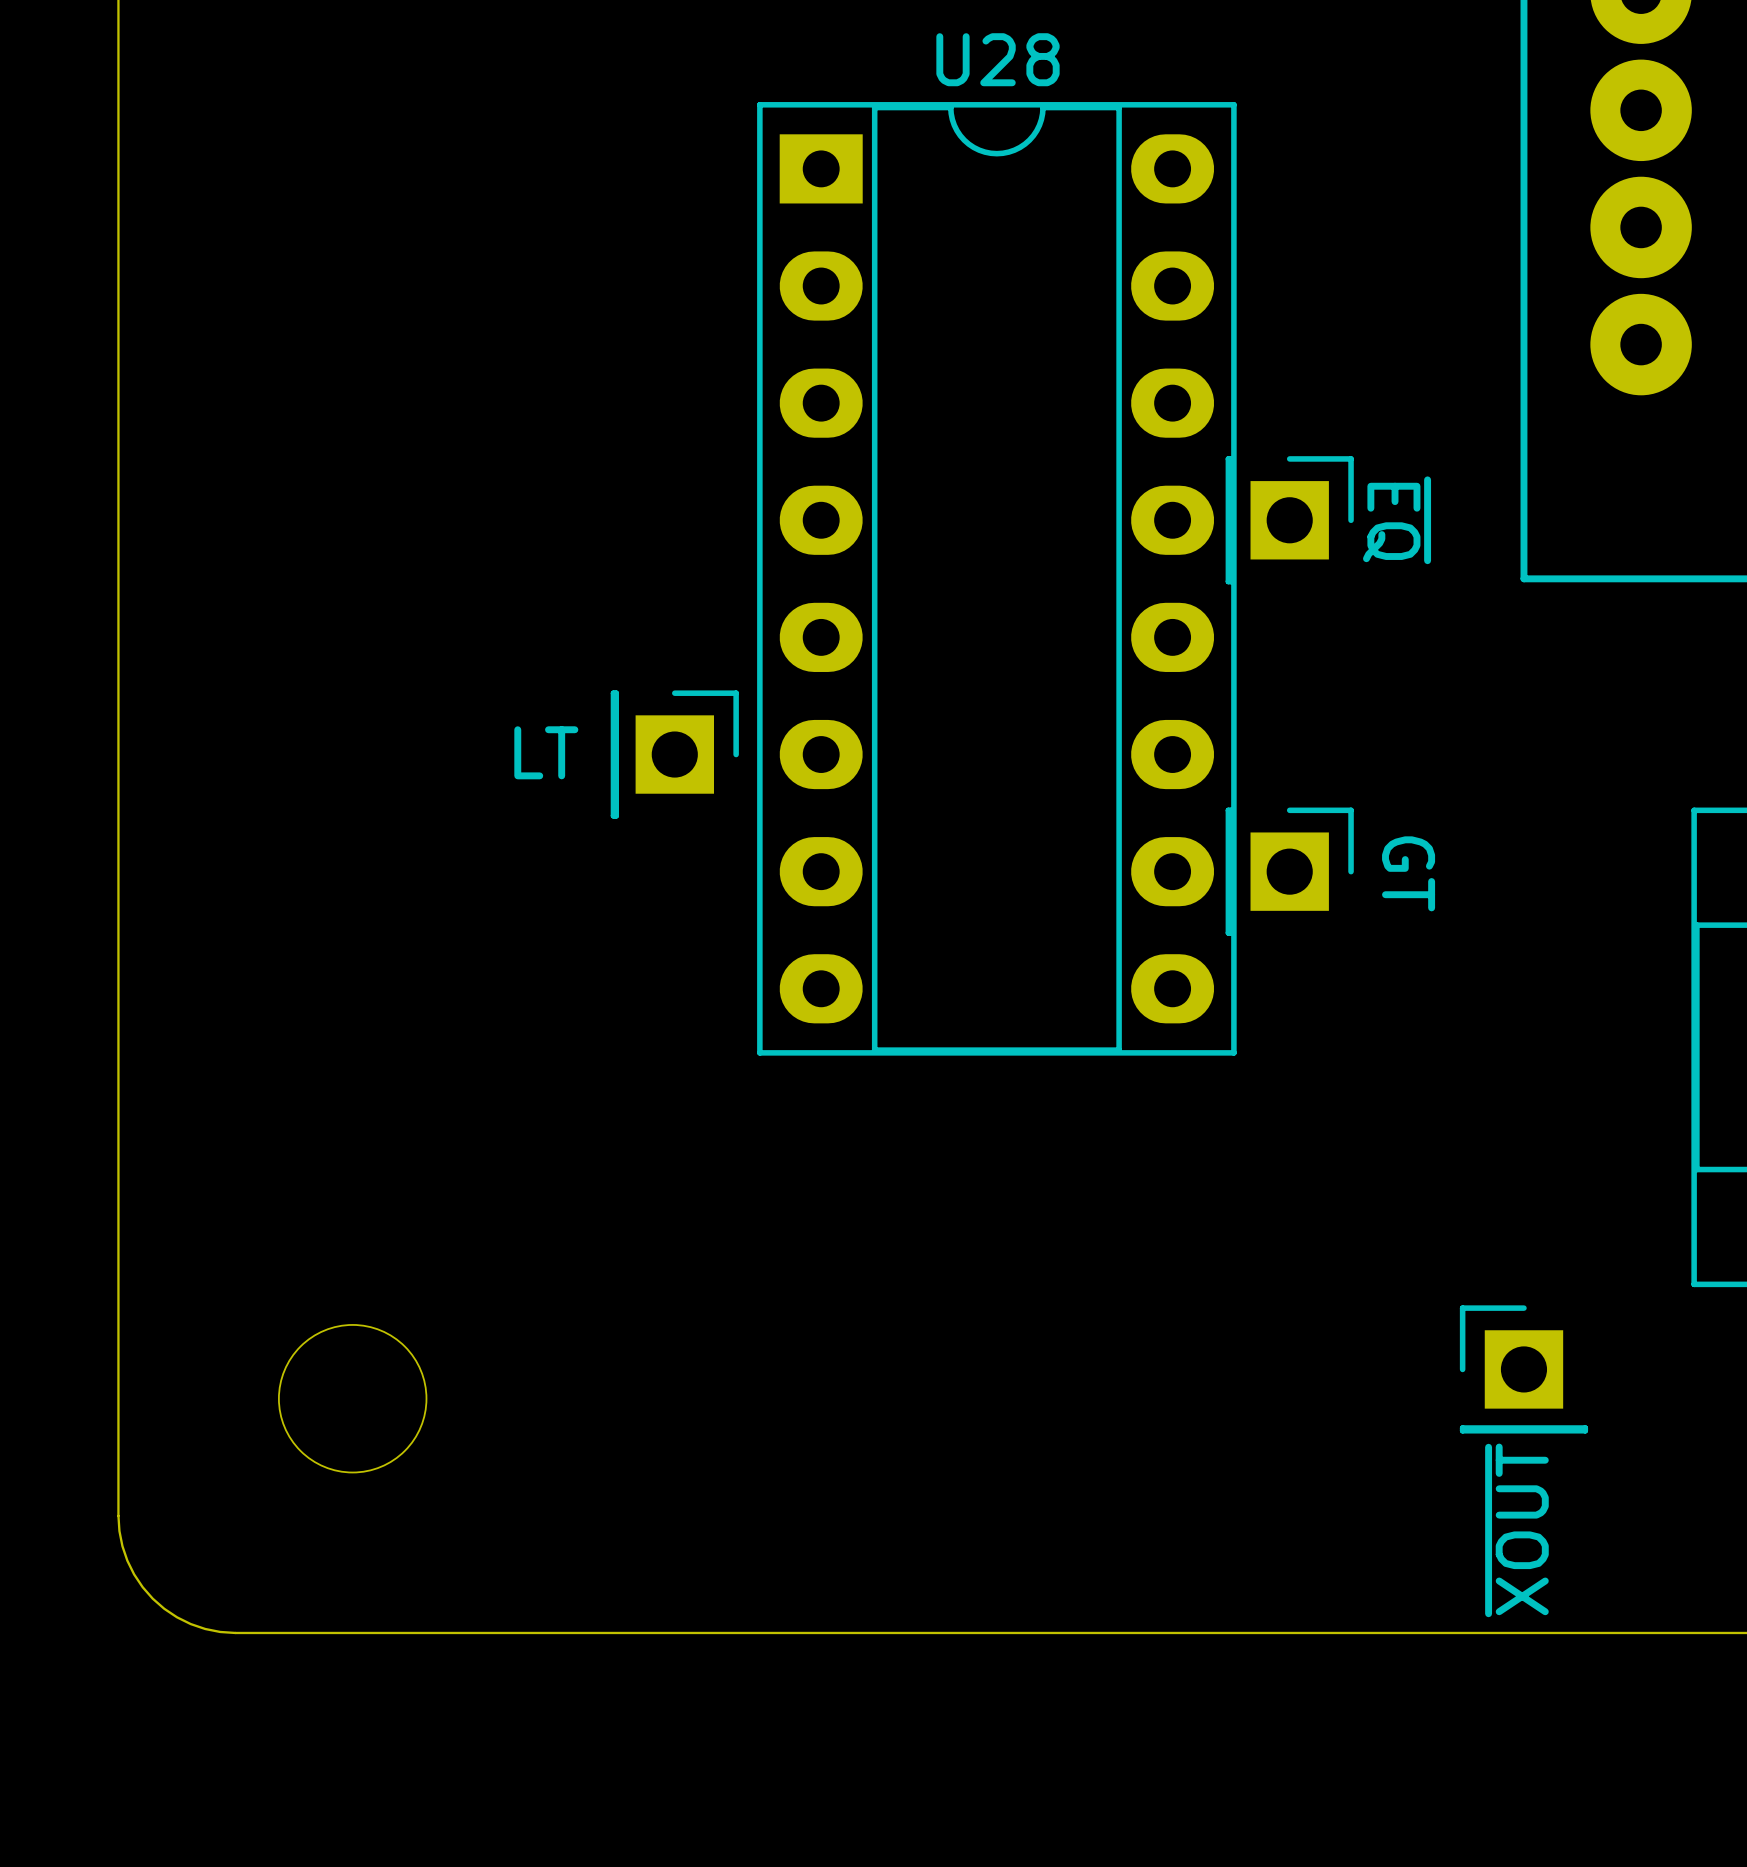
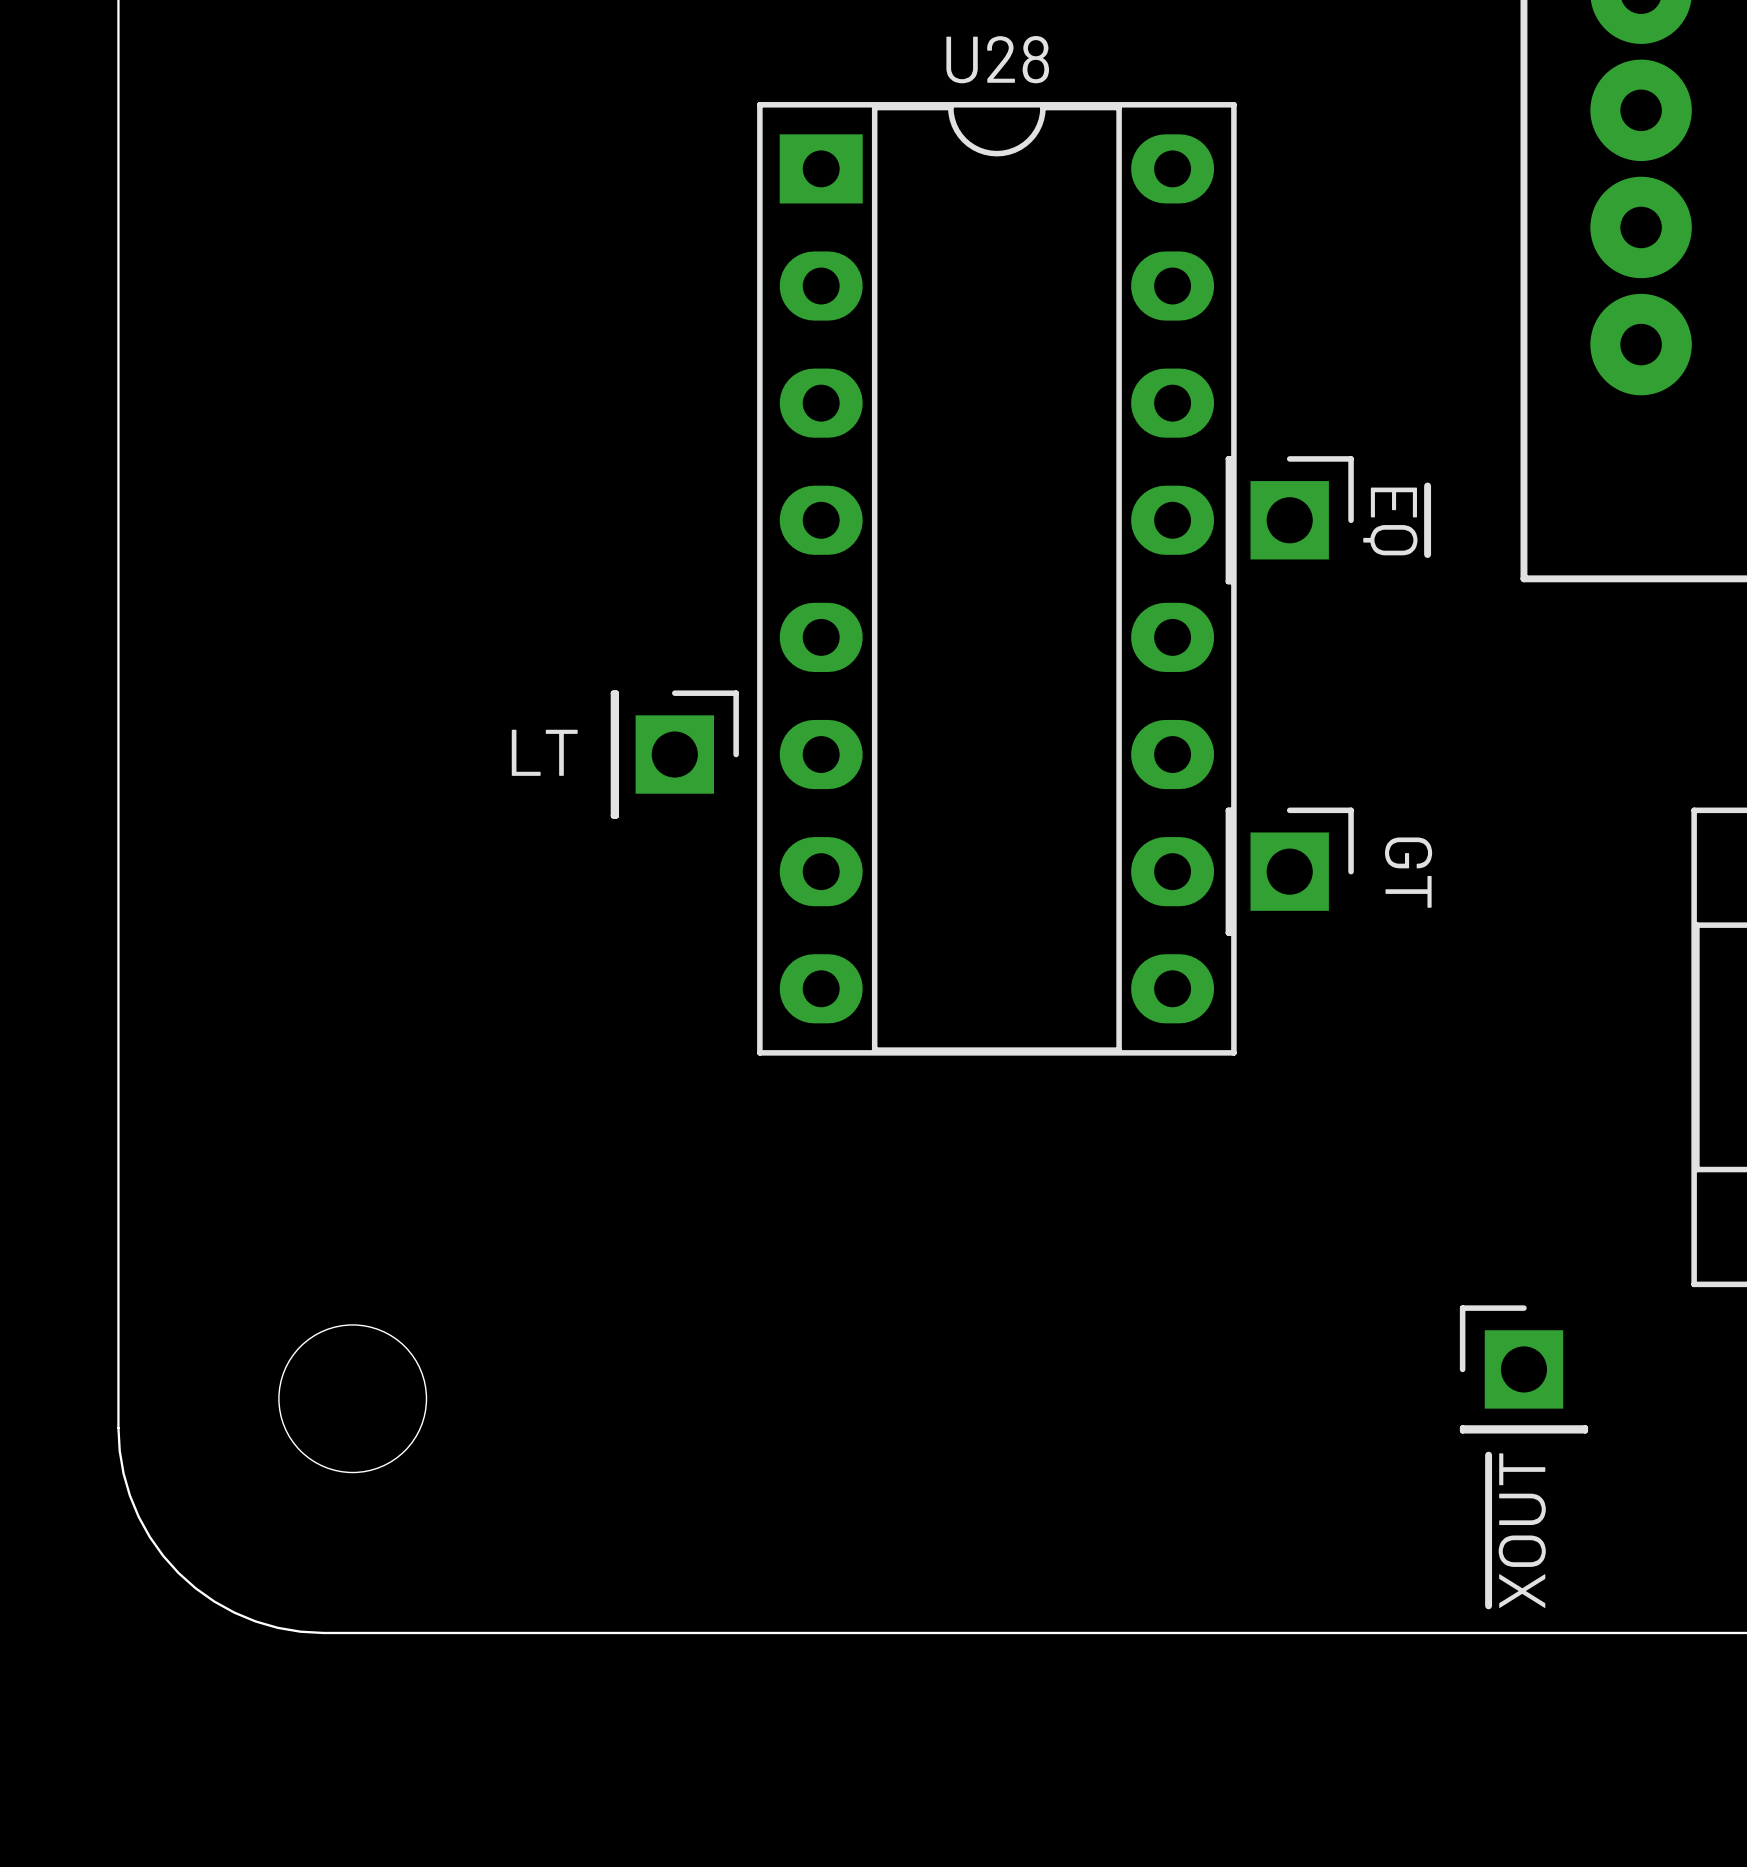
board edge: (118, 1428) (118, 1515) (122, 1546) (134, 1574) (152, 1598) (177, 1617) (205, 1628) (235, 1632) (323, 1632) -> (118, 1428) (123, 1473) (129, 1495) (149, 1537) (178, 1572) (214, 1601) (234, 1612) (277, 1627) (323, 1632)

